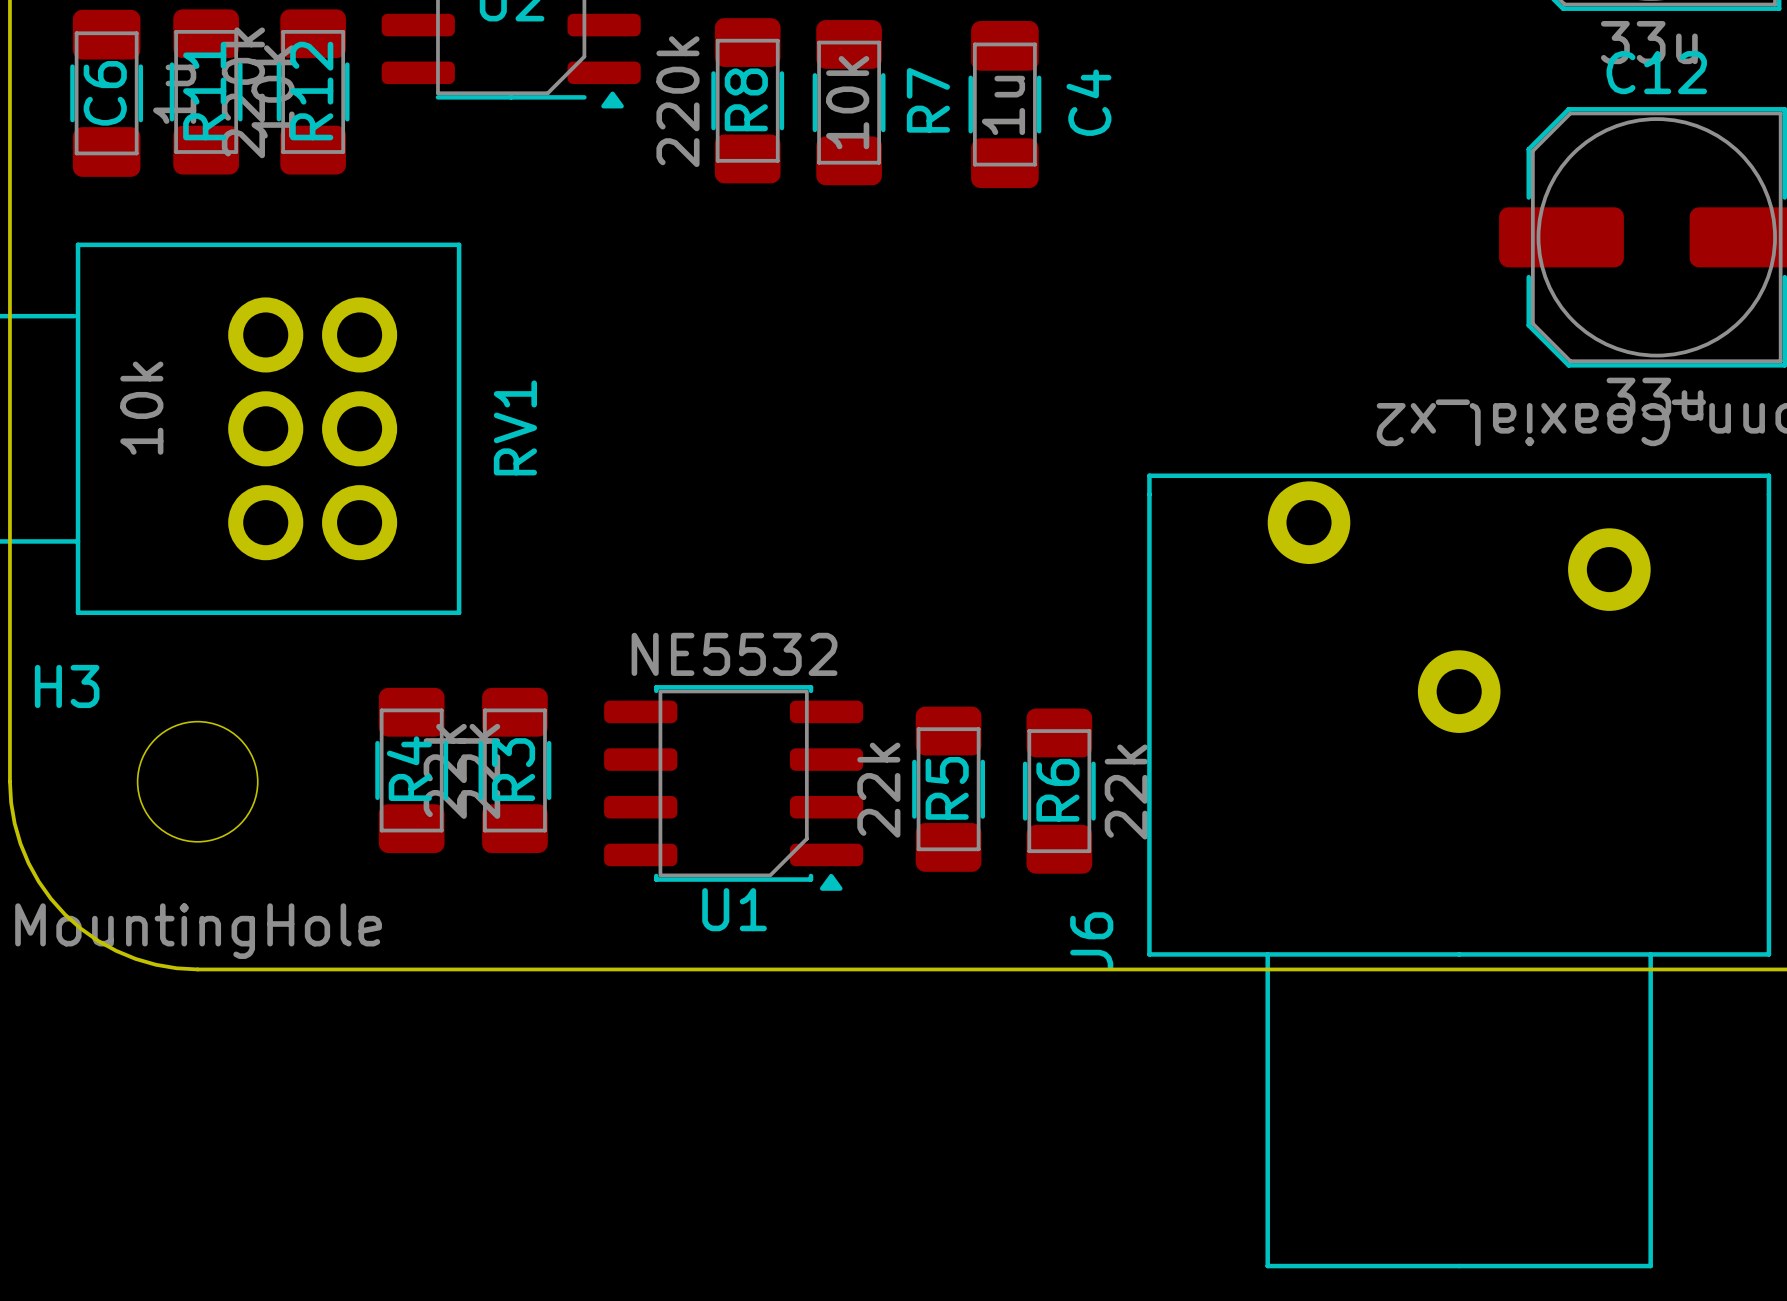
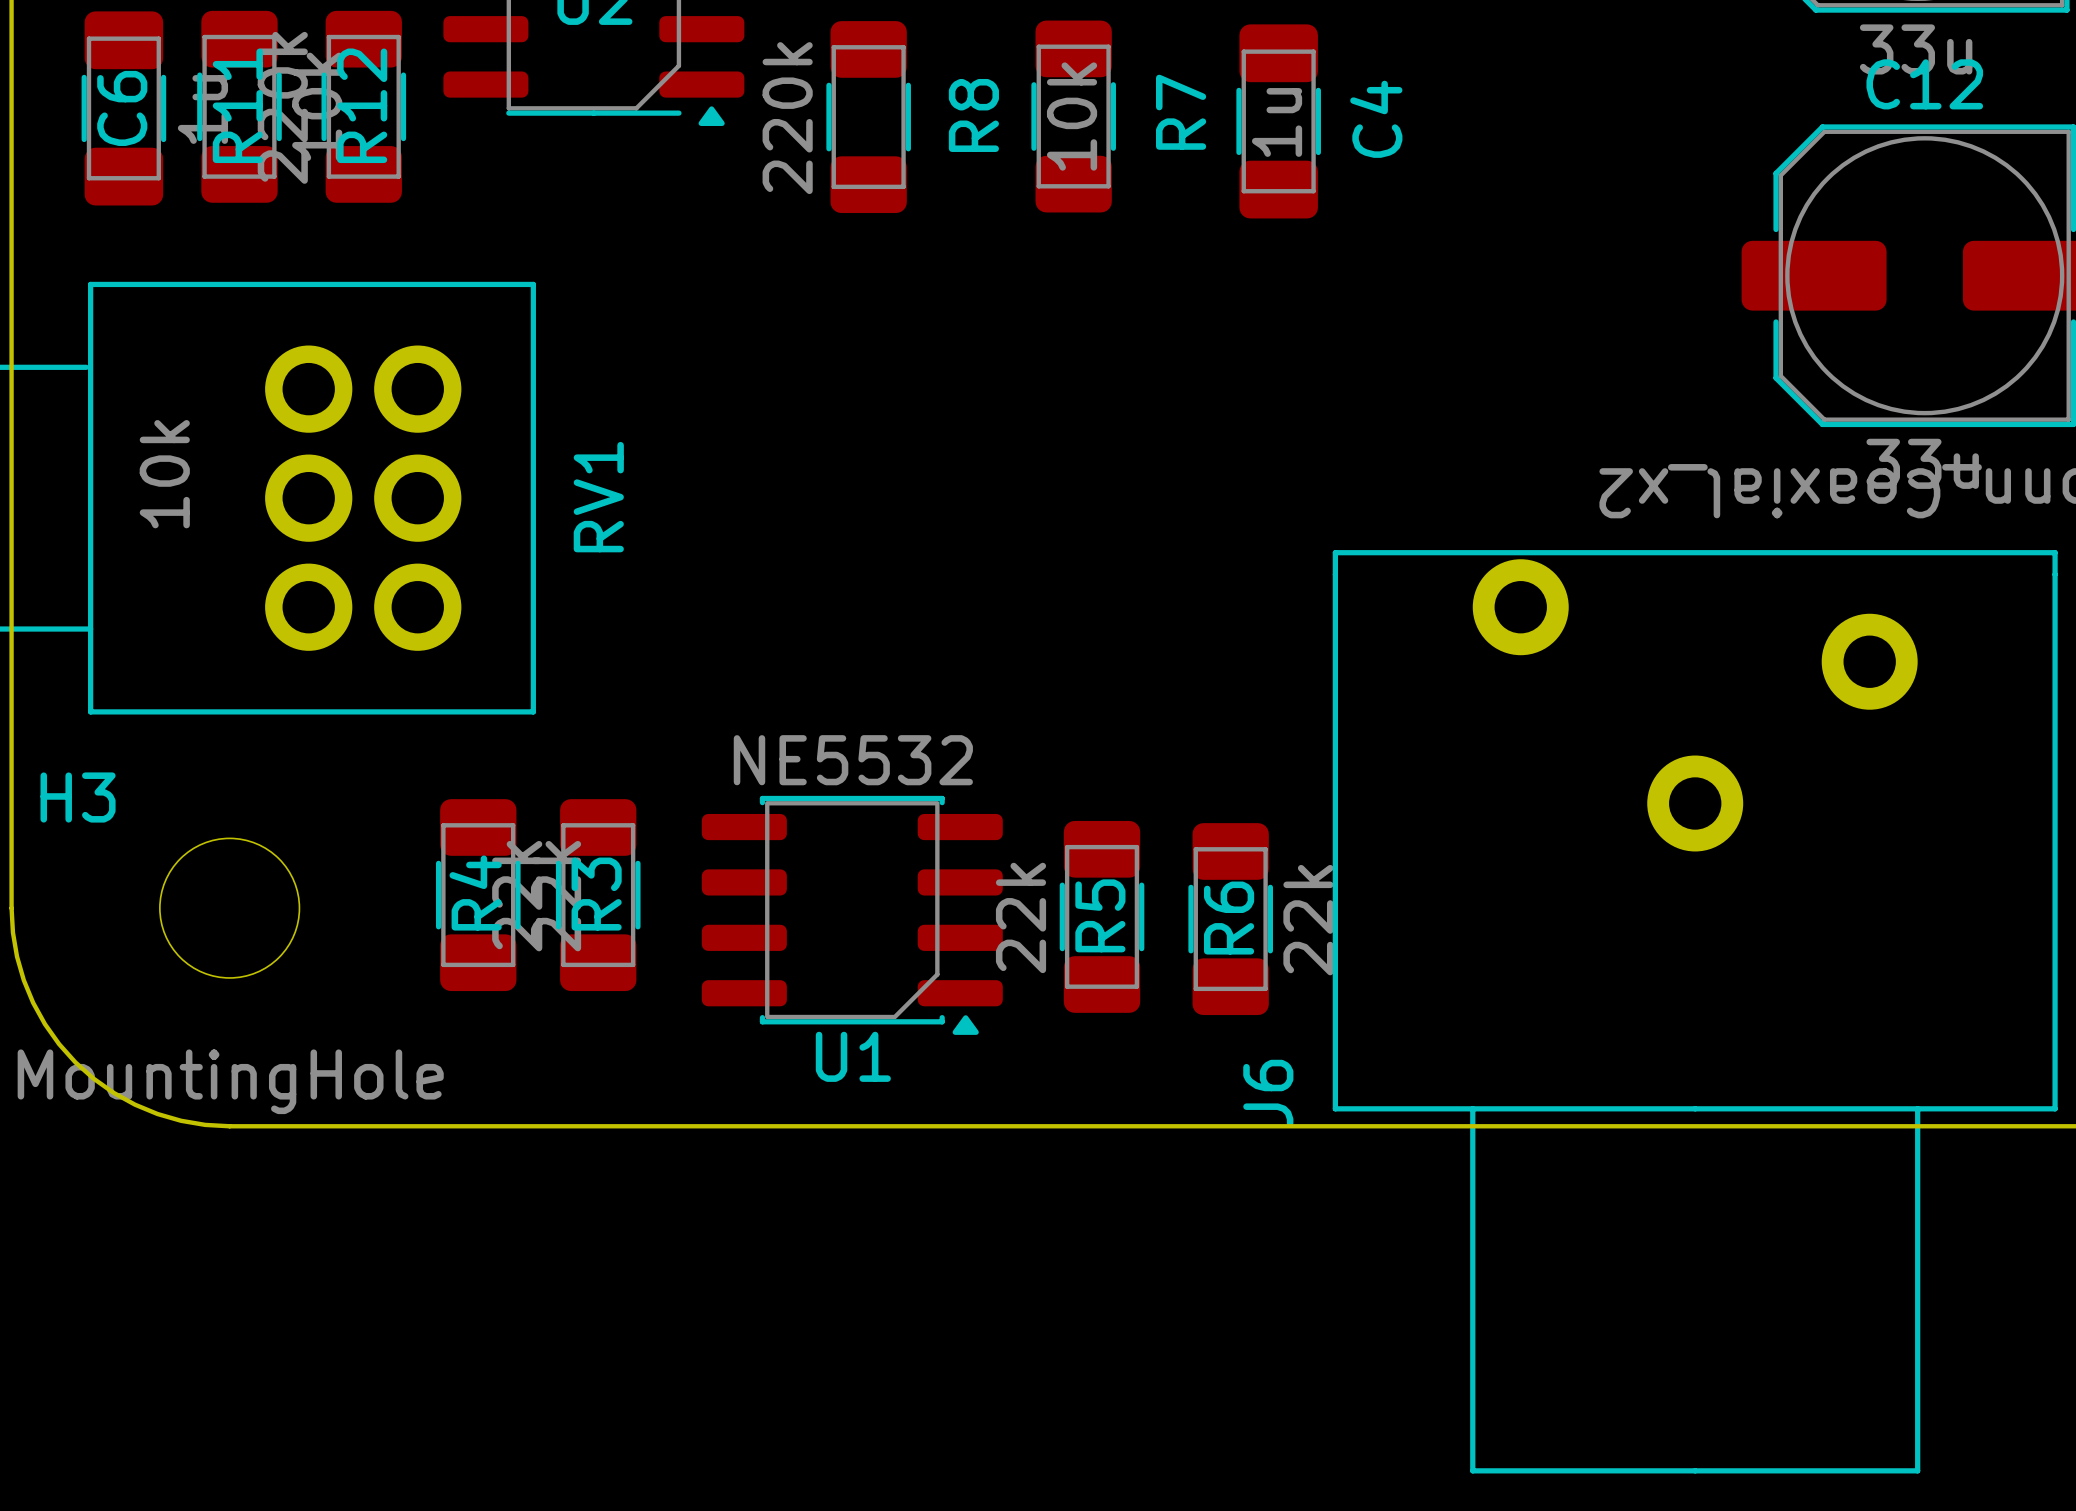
R8 name position: R8 (746, 99) -> R8 (973, 115)
R7 name position: R7 (928, 100) -> R7 (1181, 112)
R7 position: (849, 102) -> (1073, 116)
C4 position: (1004, 104) -> (1278, 121)

